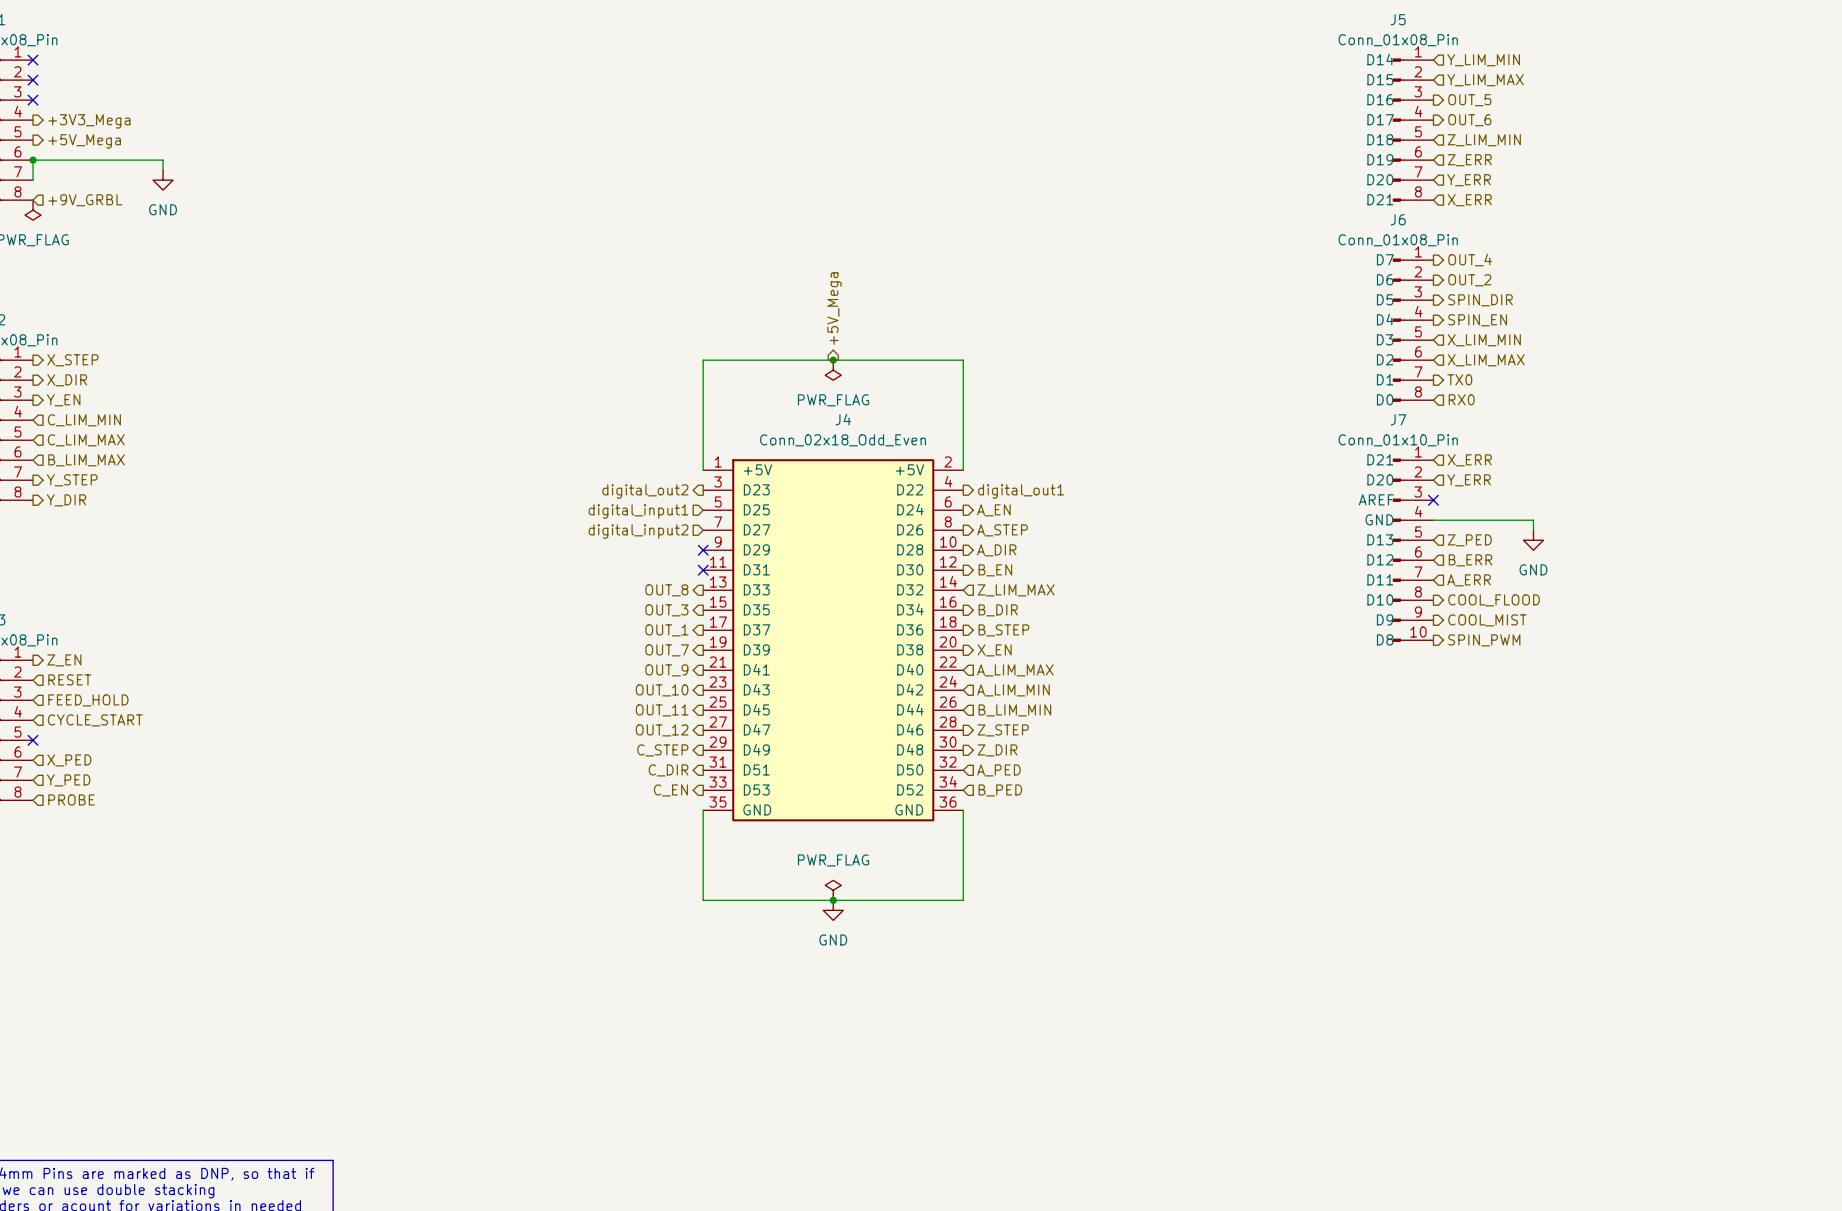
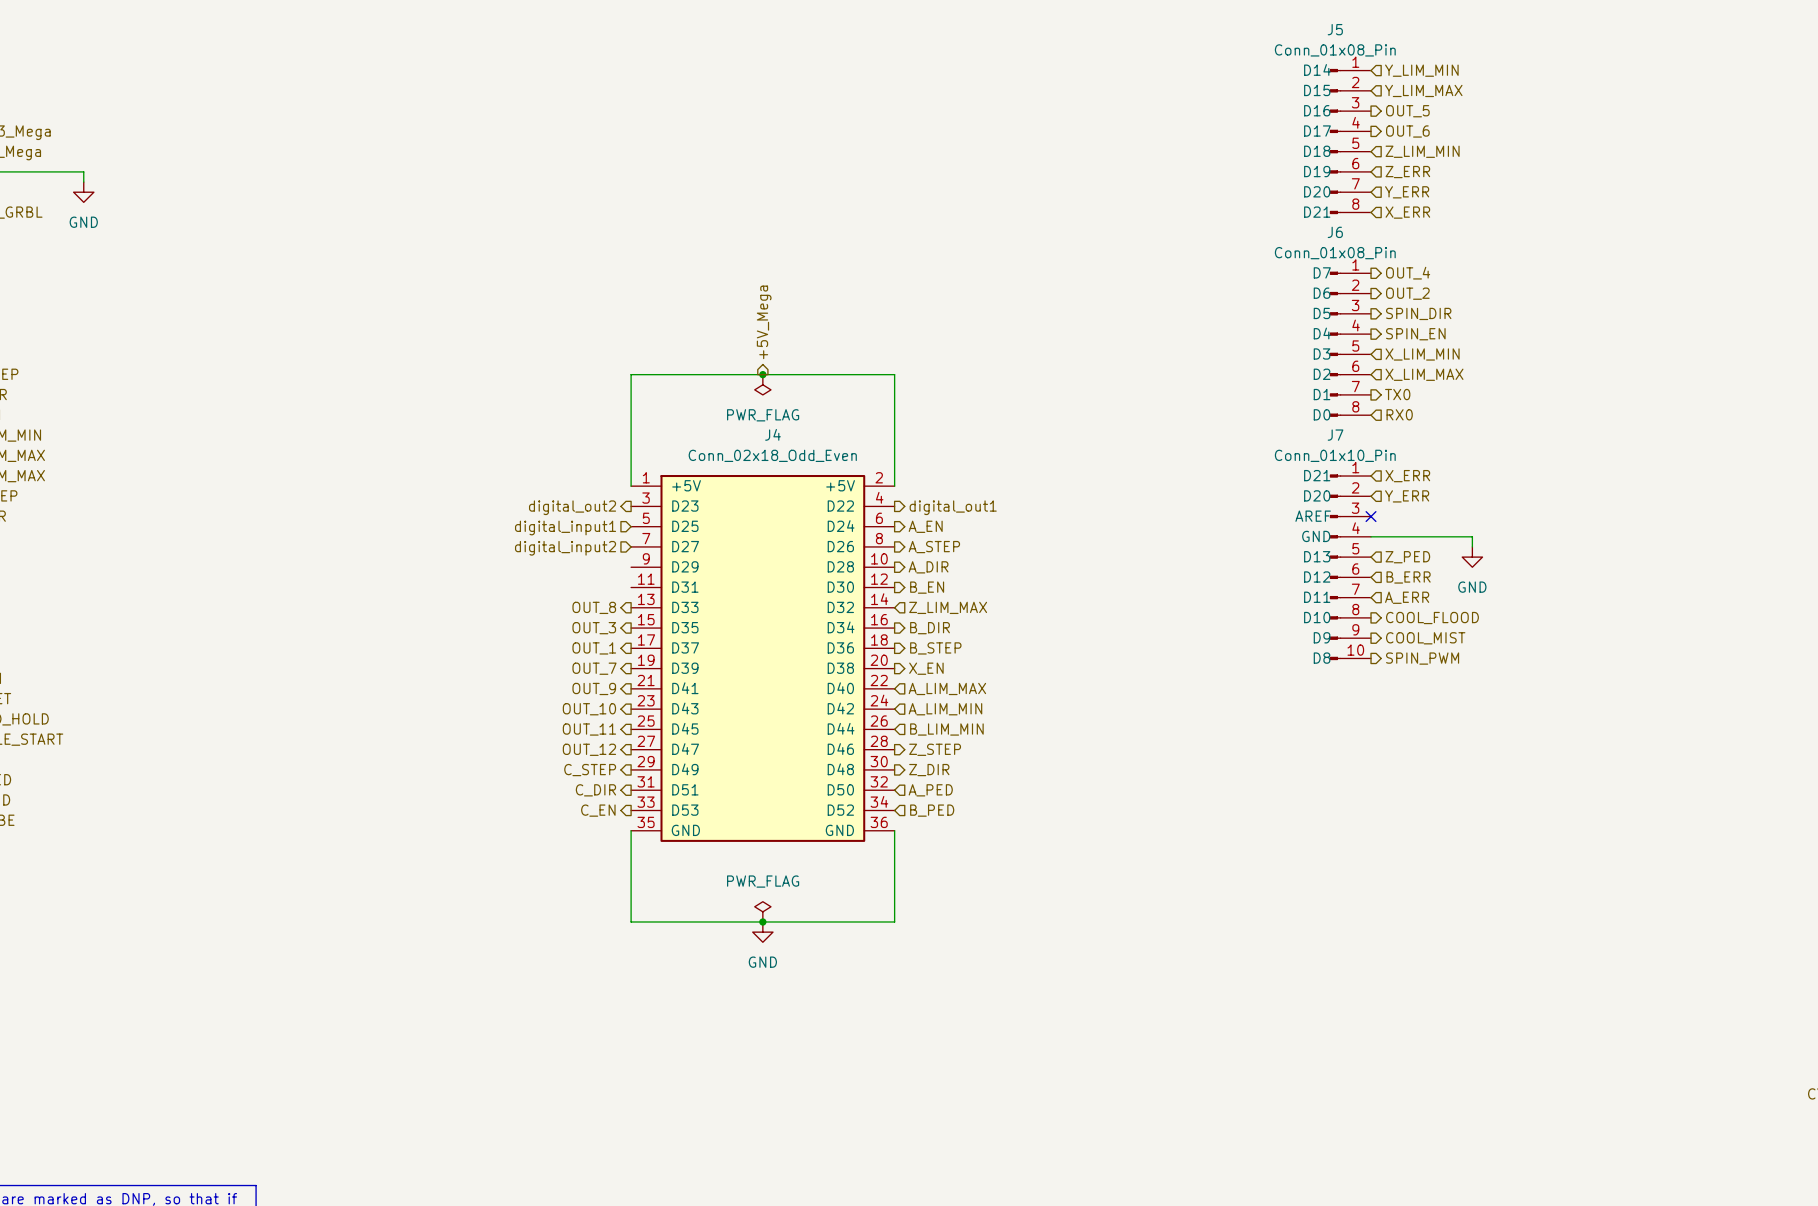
no-connect mark: (703, 550) -> none
no-connect mark: (703, 570) -> none

